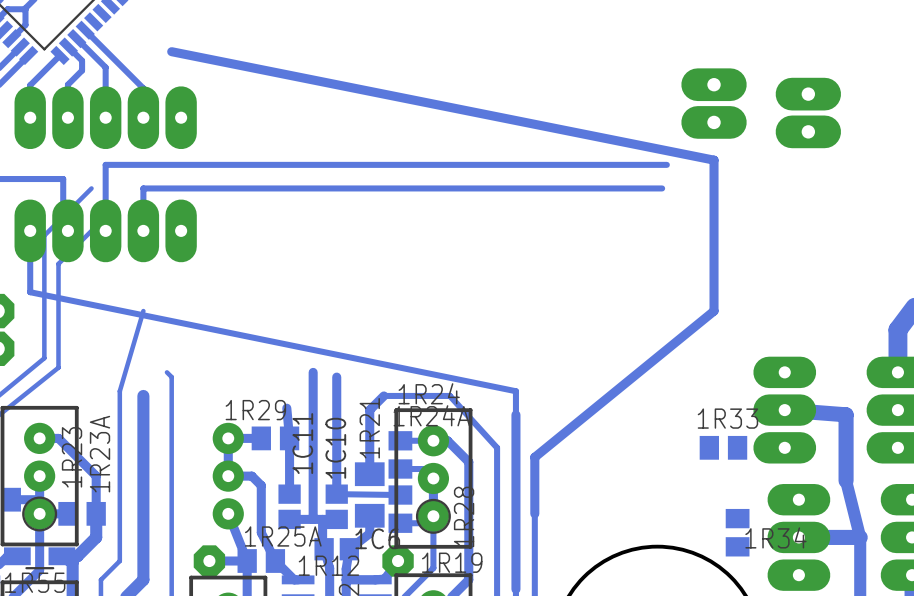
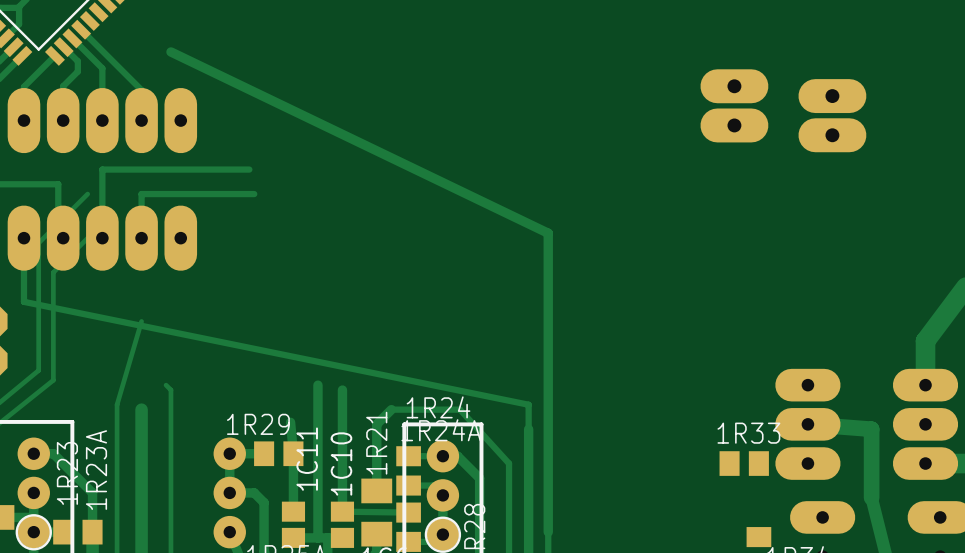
track: (171, 51) (714, 160) (714, 311) (534, 457) -> (170, 51) (548, 233) (548, 473)
track: (666, 164) (247, 164) -> none
track: (662, 188) (251, 188) -> none

